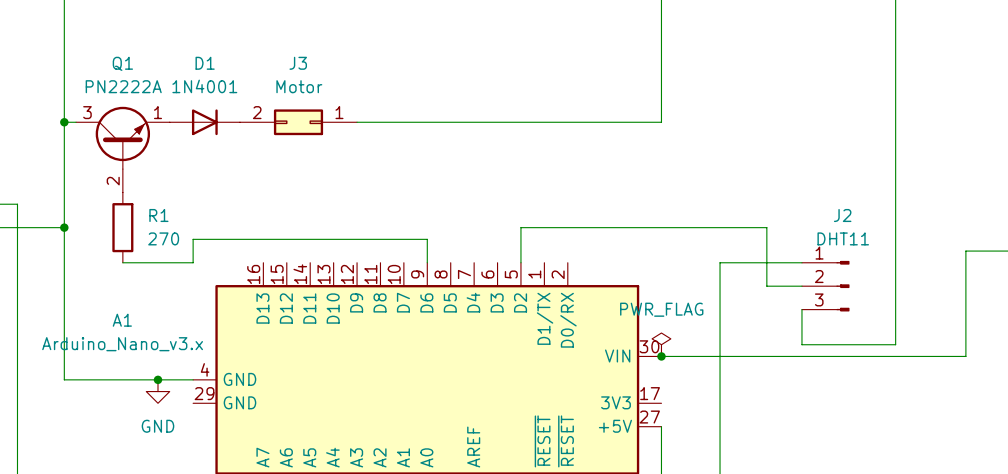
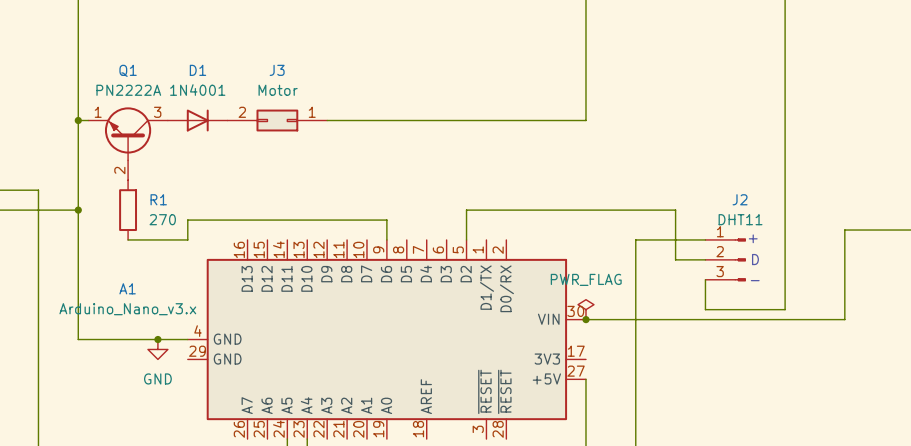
Q1 flip: as is (122, 137) -> left-right (128, 133)
text: none -> + (753, 238)
text: none -> D (755, 259)
text: none -> - (755, 280)

